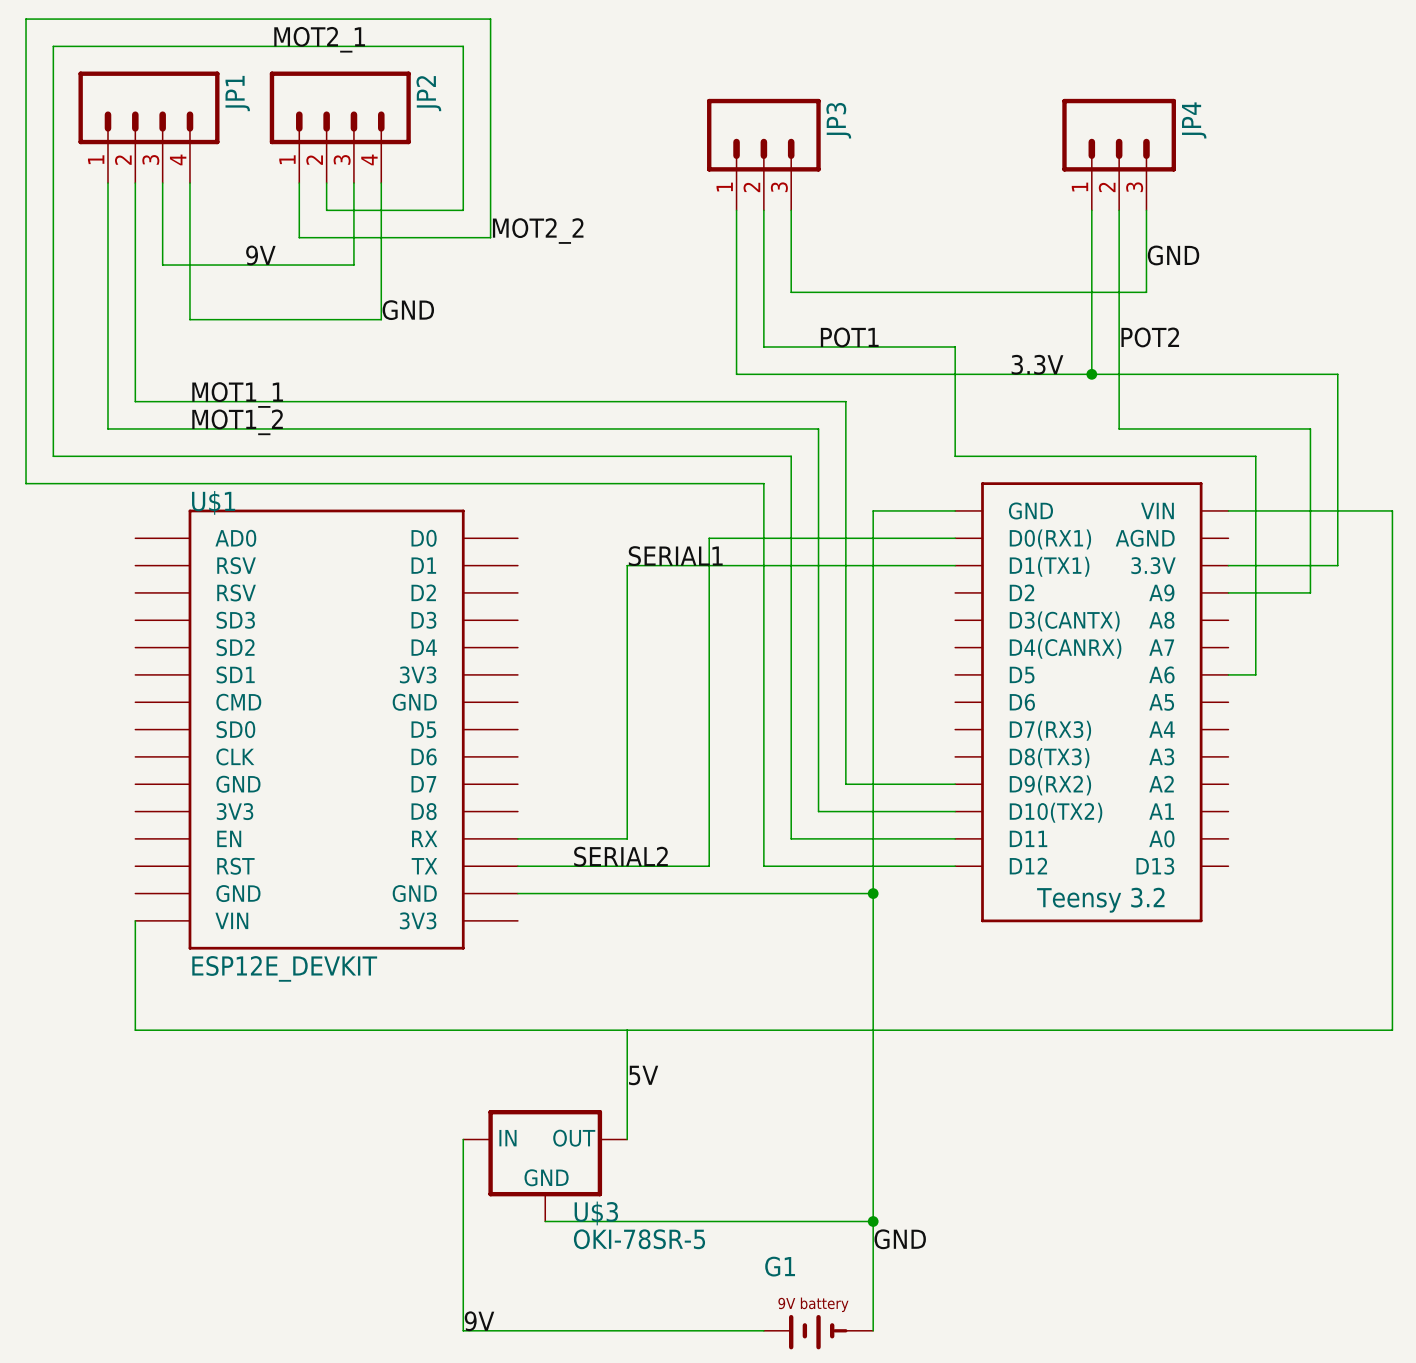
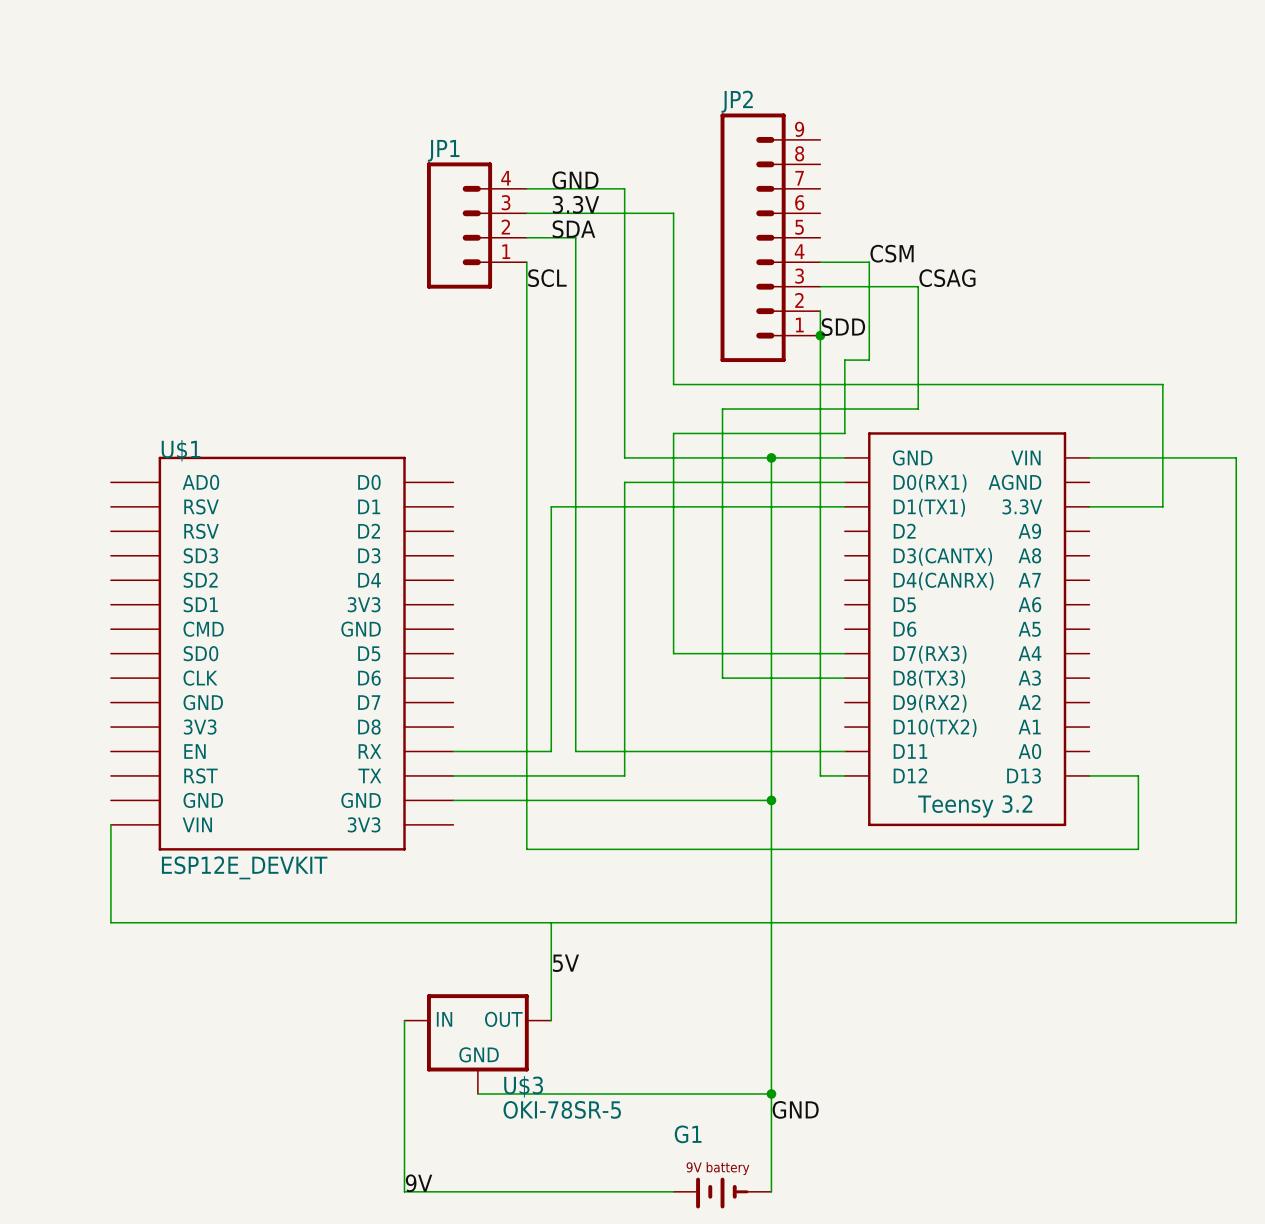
label: MOT2_1 (319, 39) -> none
JP2 symbol: [269, 71, 411, 184] -> [720, 113, 821, 363]
JP2 name position: JP2 (428, 93) -> JP2 (737, 101)
JP1 rotation: 0° (148, 107) -> 90° counterclockwise (459, 225)
JP1 position: (148, 127) -> (476, 225)
JP3: (763, 154) -> none
JP4: (1119, 154) -> none
wire: (107, 183) (107, 428) (763, 428) -> none
wire: (135, 183) (135, 401) (845, 401) (845, 784) (955, 784) -> none
wire: (162, 183) (162, 265) (353, 265) (353, 183) -> none
wire: (189, 183) (189, 319) (381, 319) (381, 183) -> none
wire: (299, 183) (299, 237) (490, 237) (490, 19) (26, 19) (26, 483) (763, 483) -> none
wire: (326, 183) (326, 210) (463, 210) (463, 46) (53, 46) (53, 456) (791, 456) (791, 838) -> (526, 237) (575, 237) (575, 751) (698, 751)
label: none -> GND (575, 180)
wire: none -> (526, 188) (624, 188) (624, 457) (771, 457)
wire: (736, 210) (736, 374) (1337, 374) (1337, 565) (1310, 565) (1310, 592) (1228, 592) -> none
wire: (763, 210) (763, 237) -> (526, 213) (673, 213)
wire: (791, 210) (791, 292) (927, 292) -> none
wire: (1091, 210) (1091, 374) -> none
wire: (1119, 210) (1119, 428) -> (722, 384) (991, 384)
wire: (1146, 210) (1146, 292) (982, 292) -> (844, 360) (869, 360) (869, 262)
label: none -> 3.3V (576, 204)
label: MOT2_2 (538, 231) -> none
label: 9V (260, 255) -> none
label: none -> SDA (573, 229)
label: GND (1173, 255) -> none
label: none -> CSM (892, 253)
wire: none -> (526, 262) (526, 849) (1138, 849) (1138, 775) (1089, 775)
label: GND (408, 310) -> none
label: none -> SCL (547, 278)
label: none -> CSAG (947, 278)
label: POT1 (849, 337) -> none
label: POT2 (1150, 337) -> none
wire: (763, 346) (955, 346) (955, 401) -> (673, 311) (673, 384)
wire: none -> (820, 311) (820, 775)
label: none -> SDD (843, 327)
label: 3.3V (1037, 364) -> none
junction: none -> (820, 335)
junction: (1091, 374) -> none
label: MOT1_1 (237, 395) -> none
label: MOT1_2 (237, 422) -> none
wire: (818, 428) (818, 456) -> (673, 433) (844, 433) (844, 409) (722, 409)
wire: (1037, 456) (1255, 456) (1255, 674) (1228, 674) -> (918, 409) (918, 286) (820, 286)
junction: none -> (771, 457)
label: SERIAL1 (675, 556) -> none
wire: (763, 729) (763, 866) (927, 866) -> (673, 653) (844, 653)
wire: (818, 756) (818, 811) (955, 811) -> (722, 678) (844, 678)
label: SERIAL2 (620, 856) -> none

